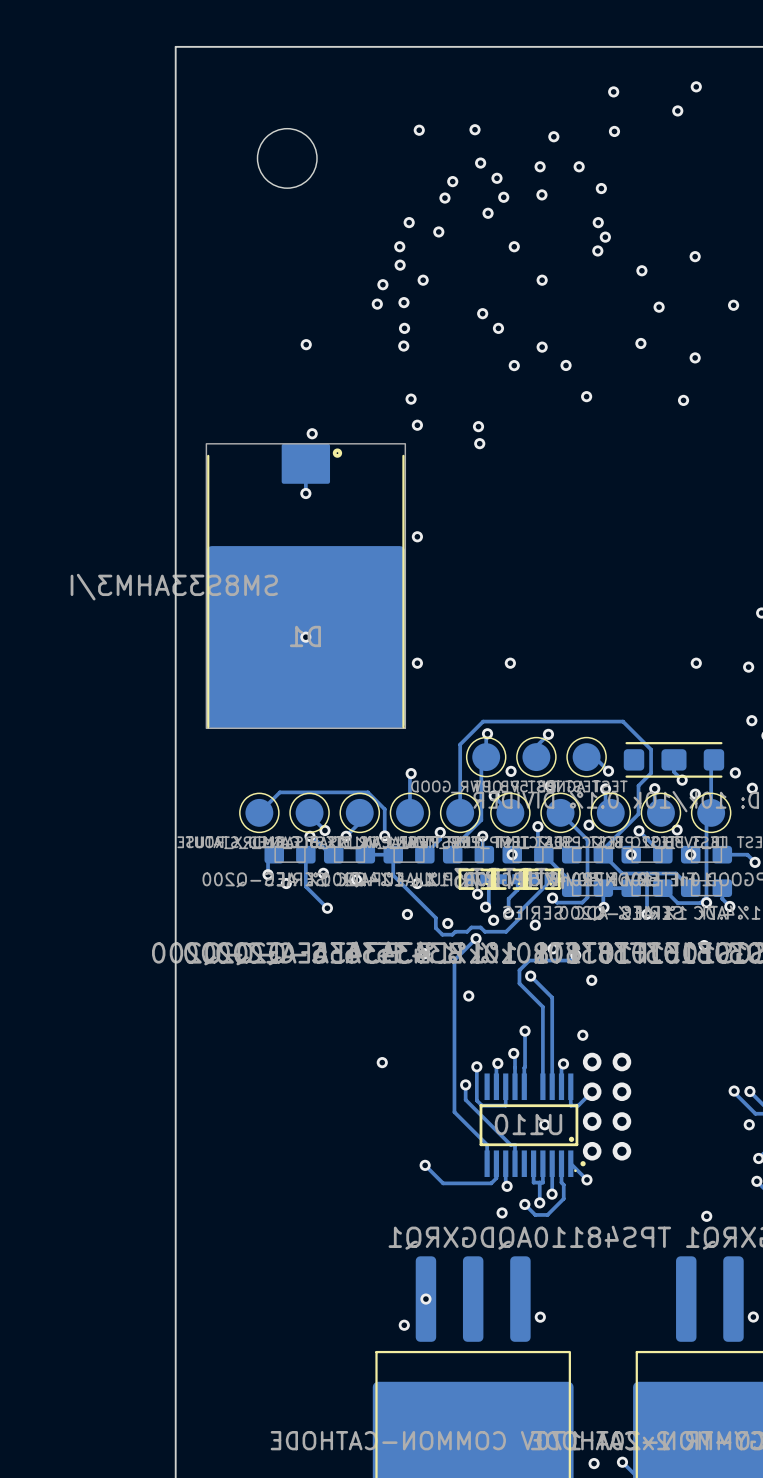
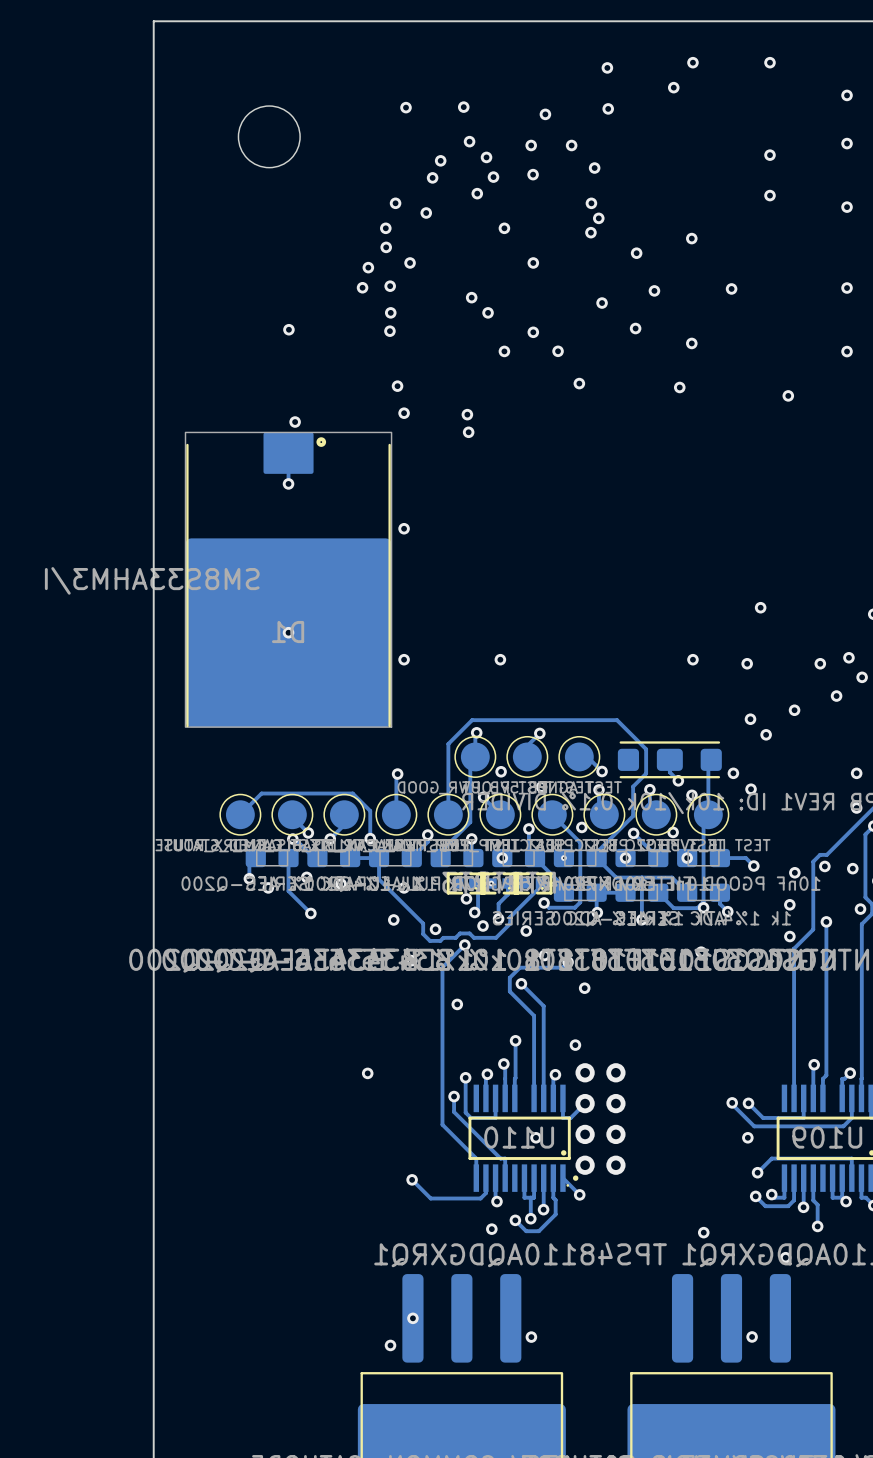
via: none -> (602, 303)
via: none -> (563, 858)
via: none -> (491, 883)

